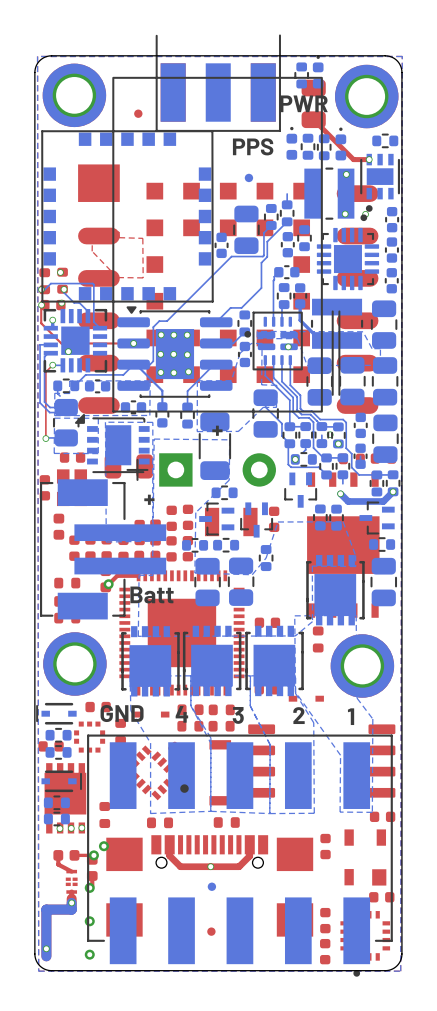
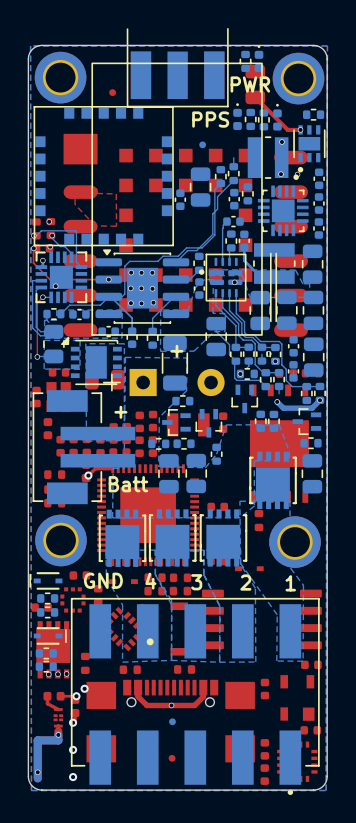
bottom track: (263, 255) (231, 256) (167, 321) -> (214, 207) (214, 235) (202, 247) (186, 247) (178, 256) (163, 256) (157, 261) (135, 261)

